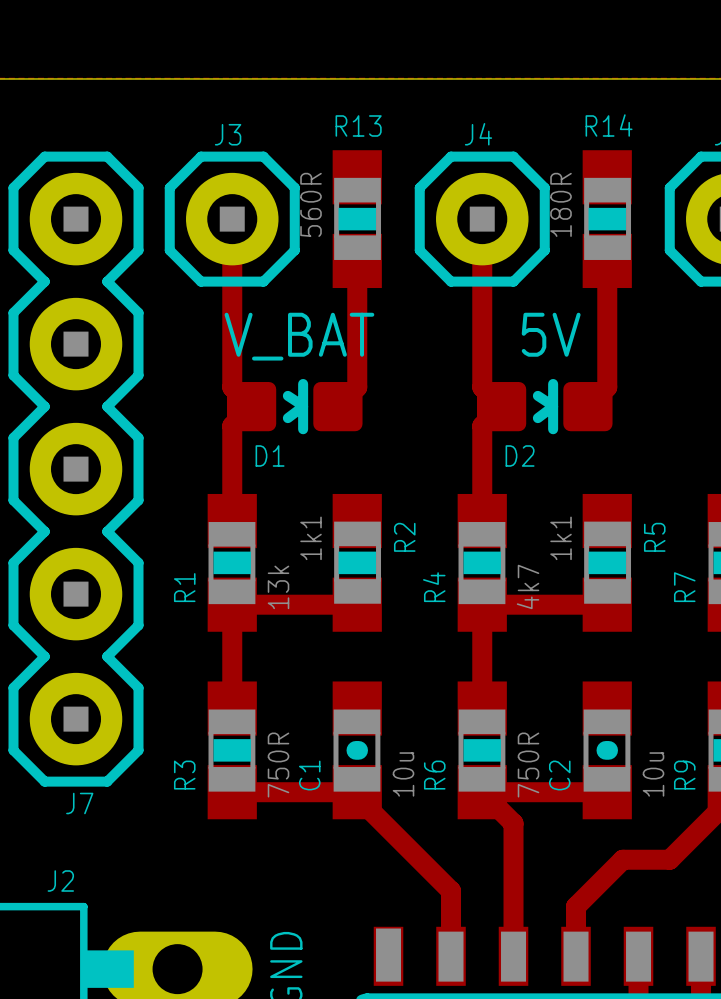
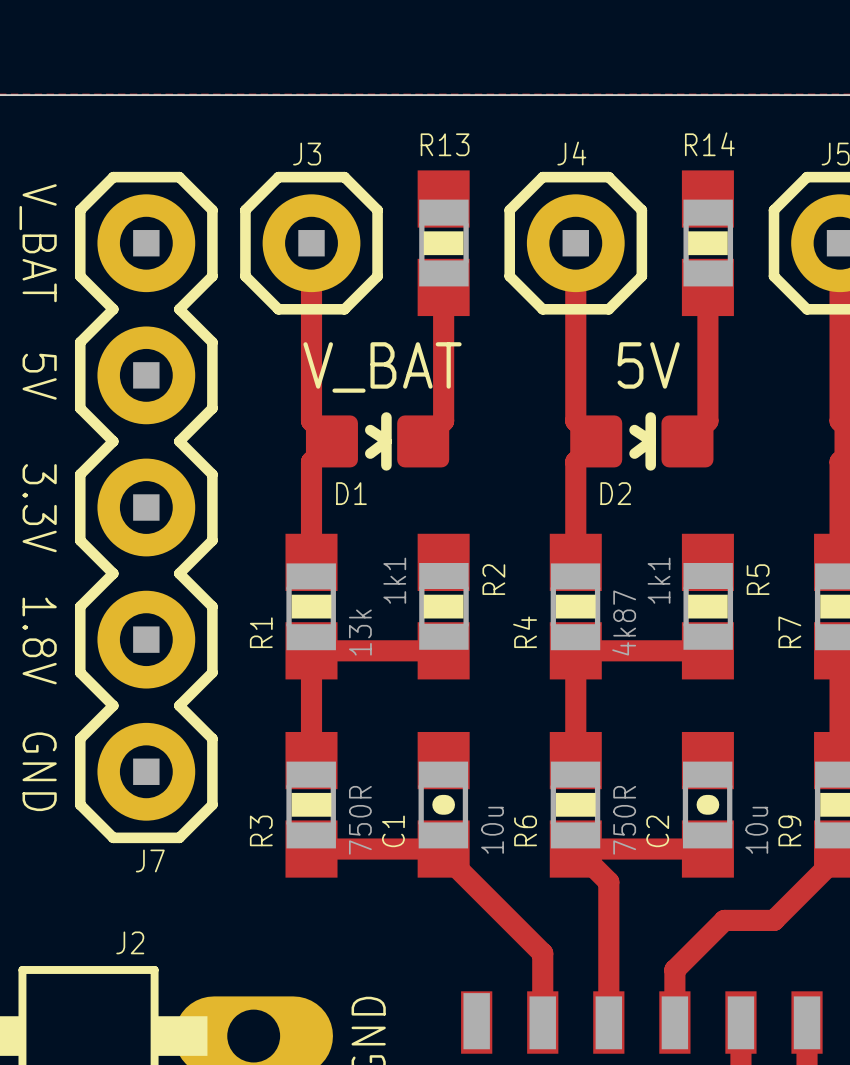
R13 value: 560R (311, 204) -> none
R14 value: 180R (561, 204) -> none
R4 value: 4k7 (528, 586) -> 4k87 (624, 623)

